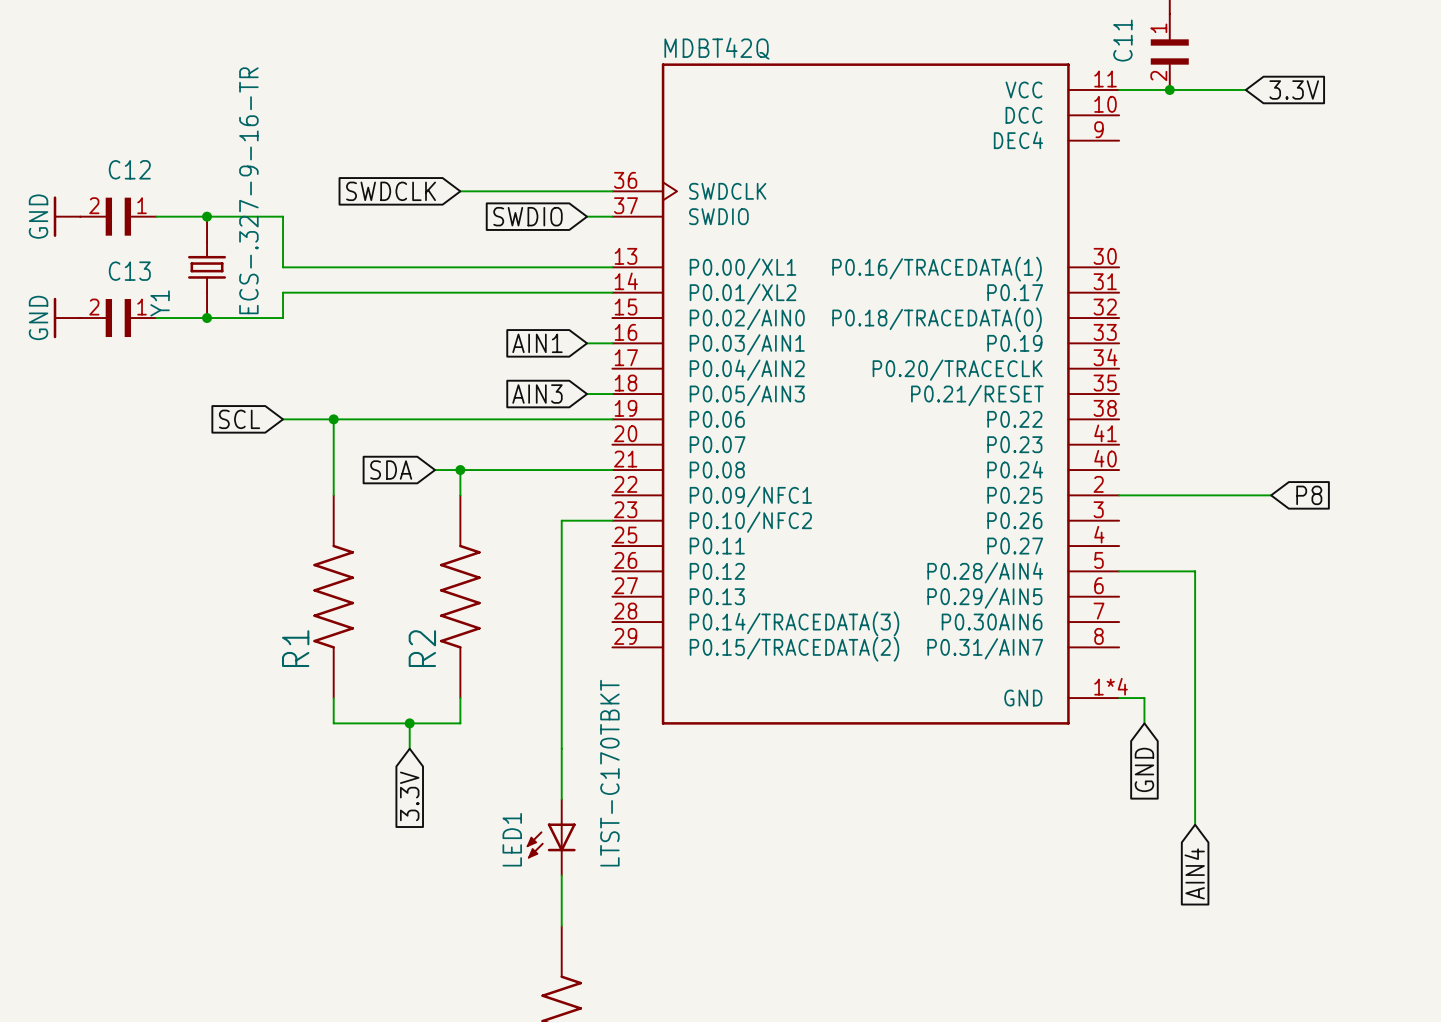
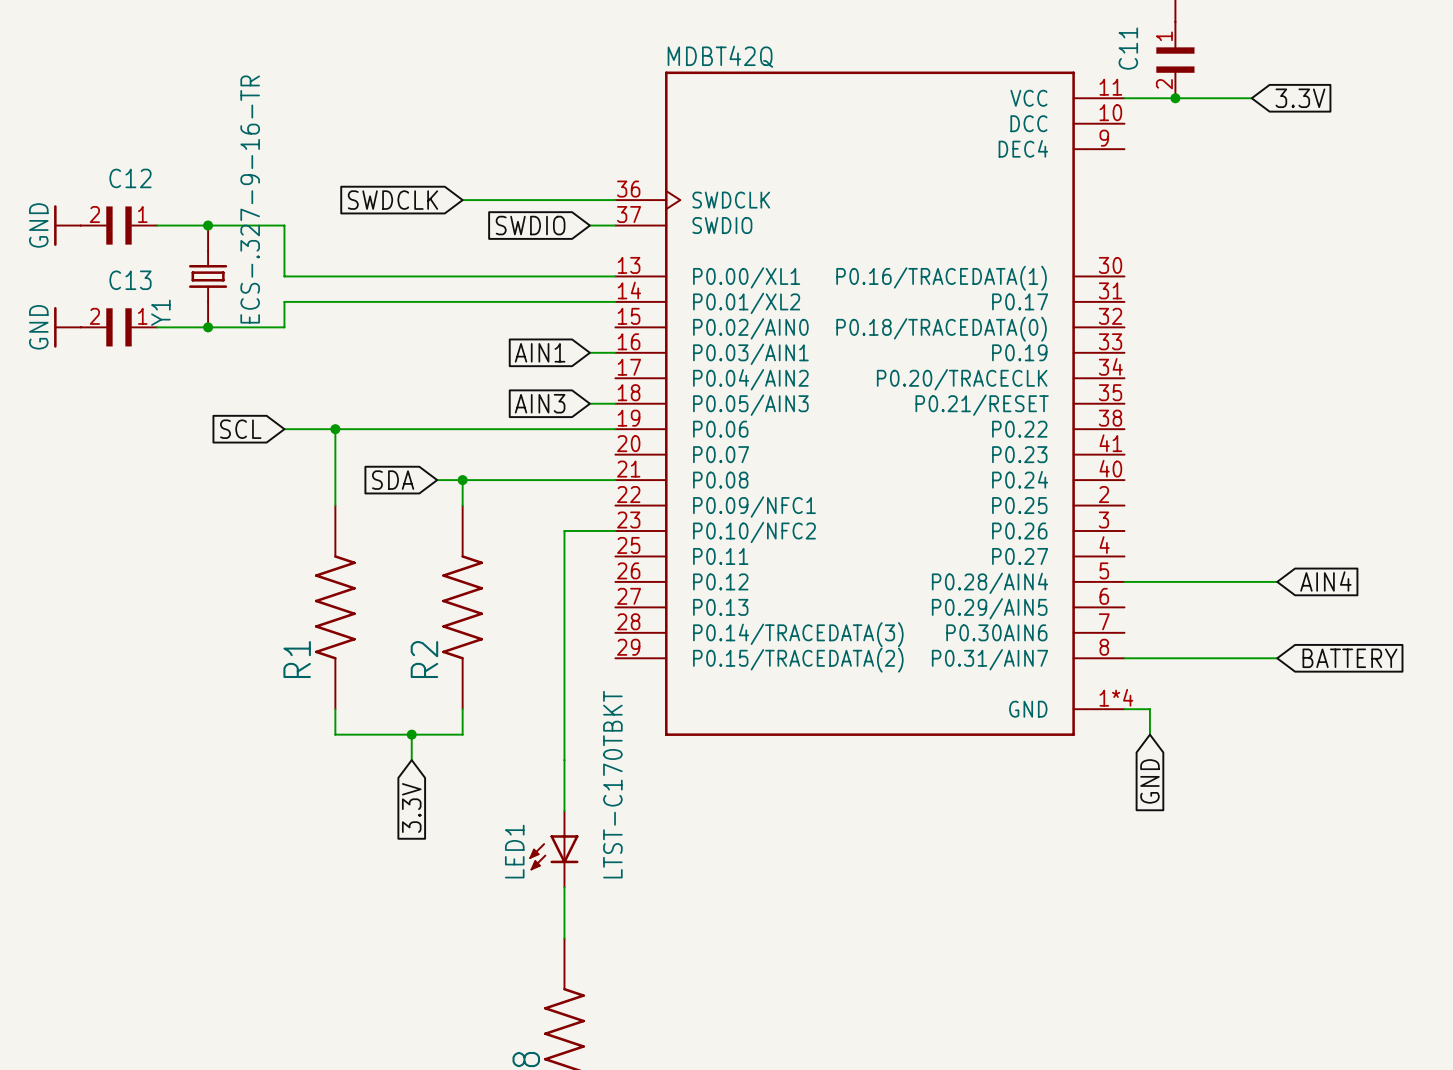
wire: (1119, 495) (1271, 495) -> (1124, 658) (1277, 658)
global label: P8 (1309, 495) -> none
global label: none -> AIN4 (1325, 581)
wire: (1195, 571) (1195, 824) -> (1200, 581) (1277, 581)
global label: none -> BATTERY (1349, 658)
global label: AIN4 (1194, 873) -> none

